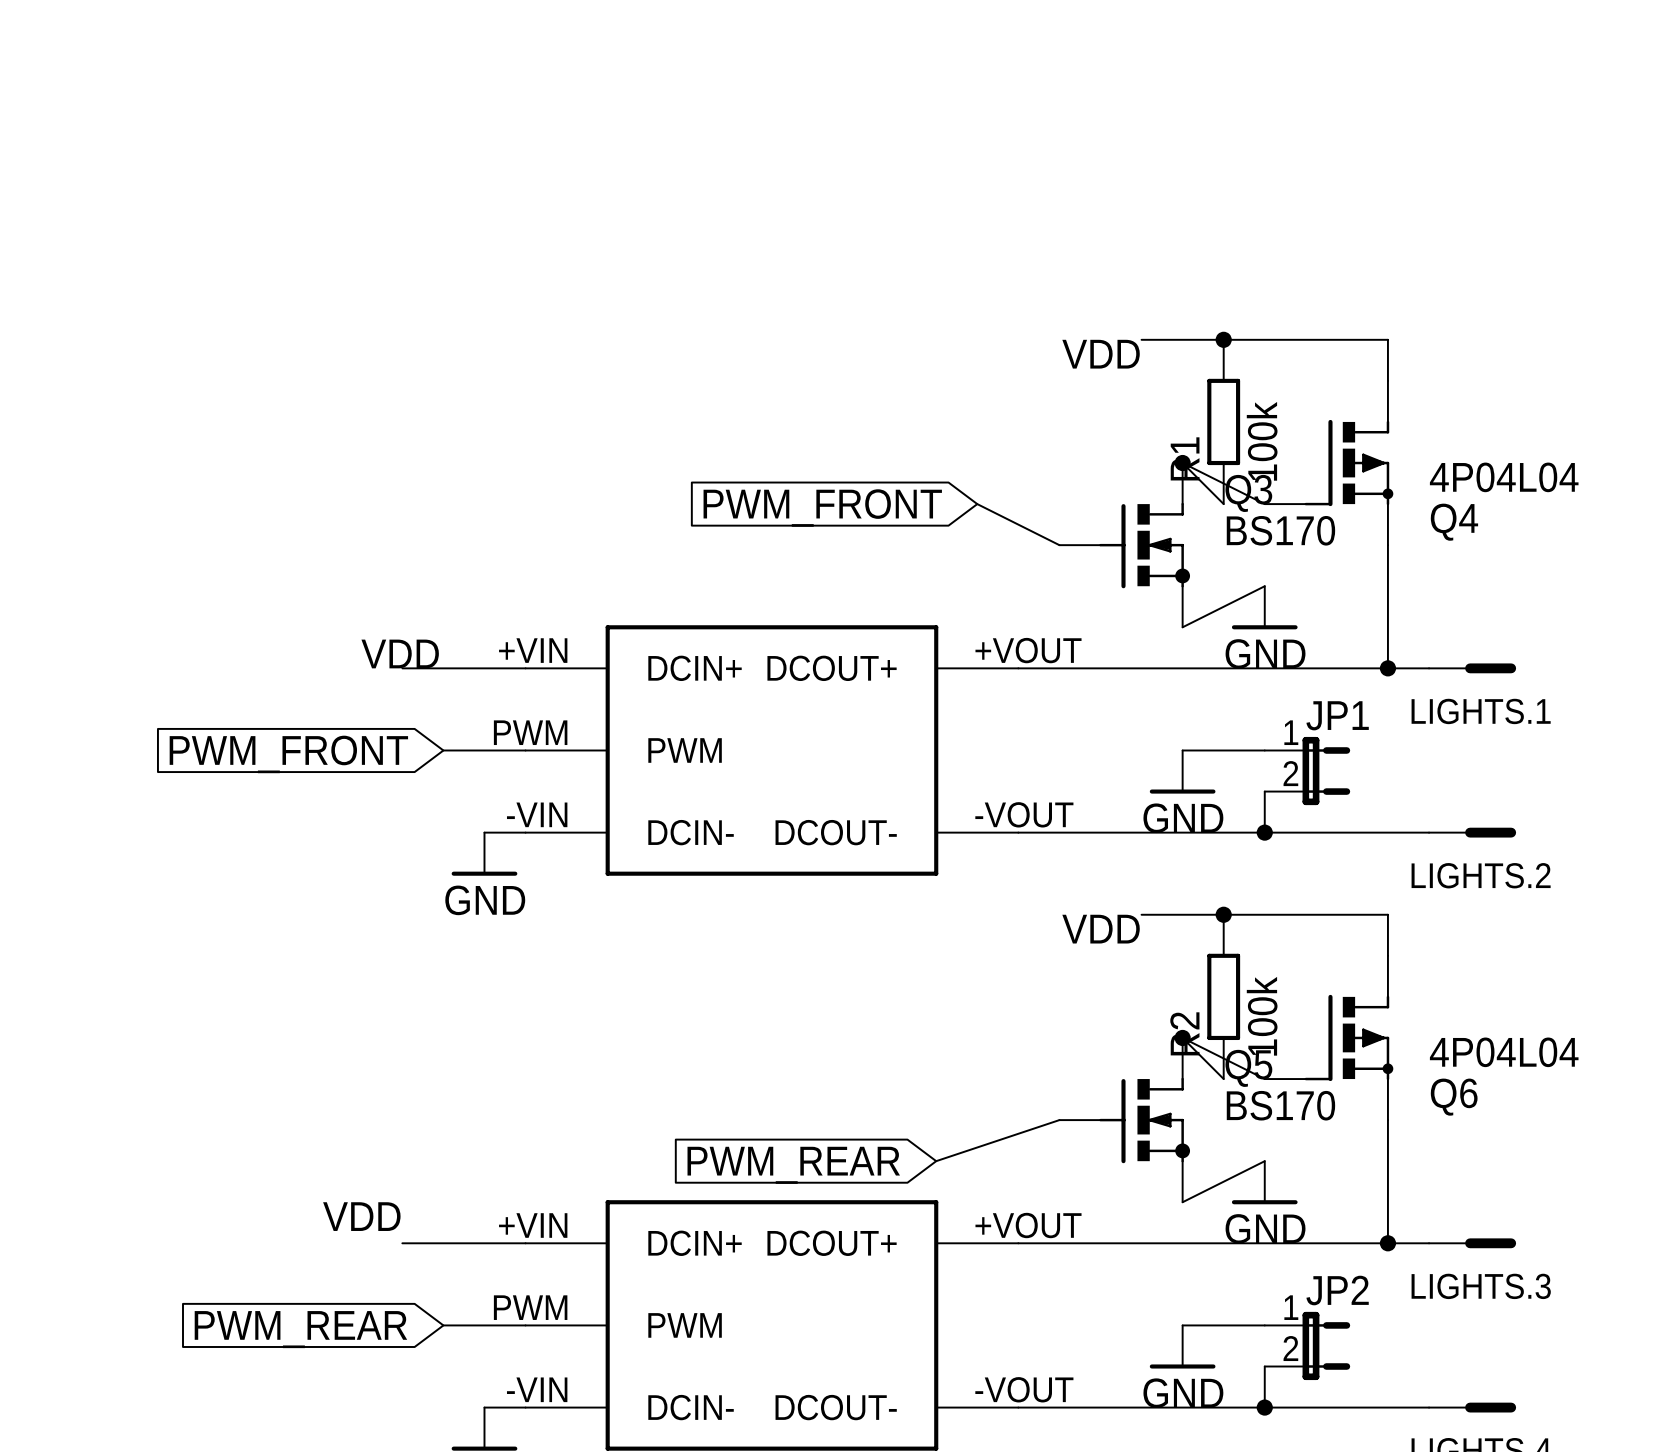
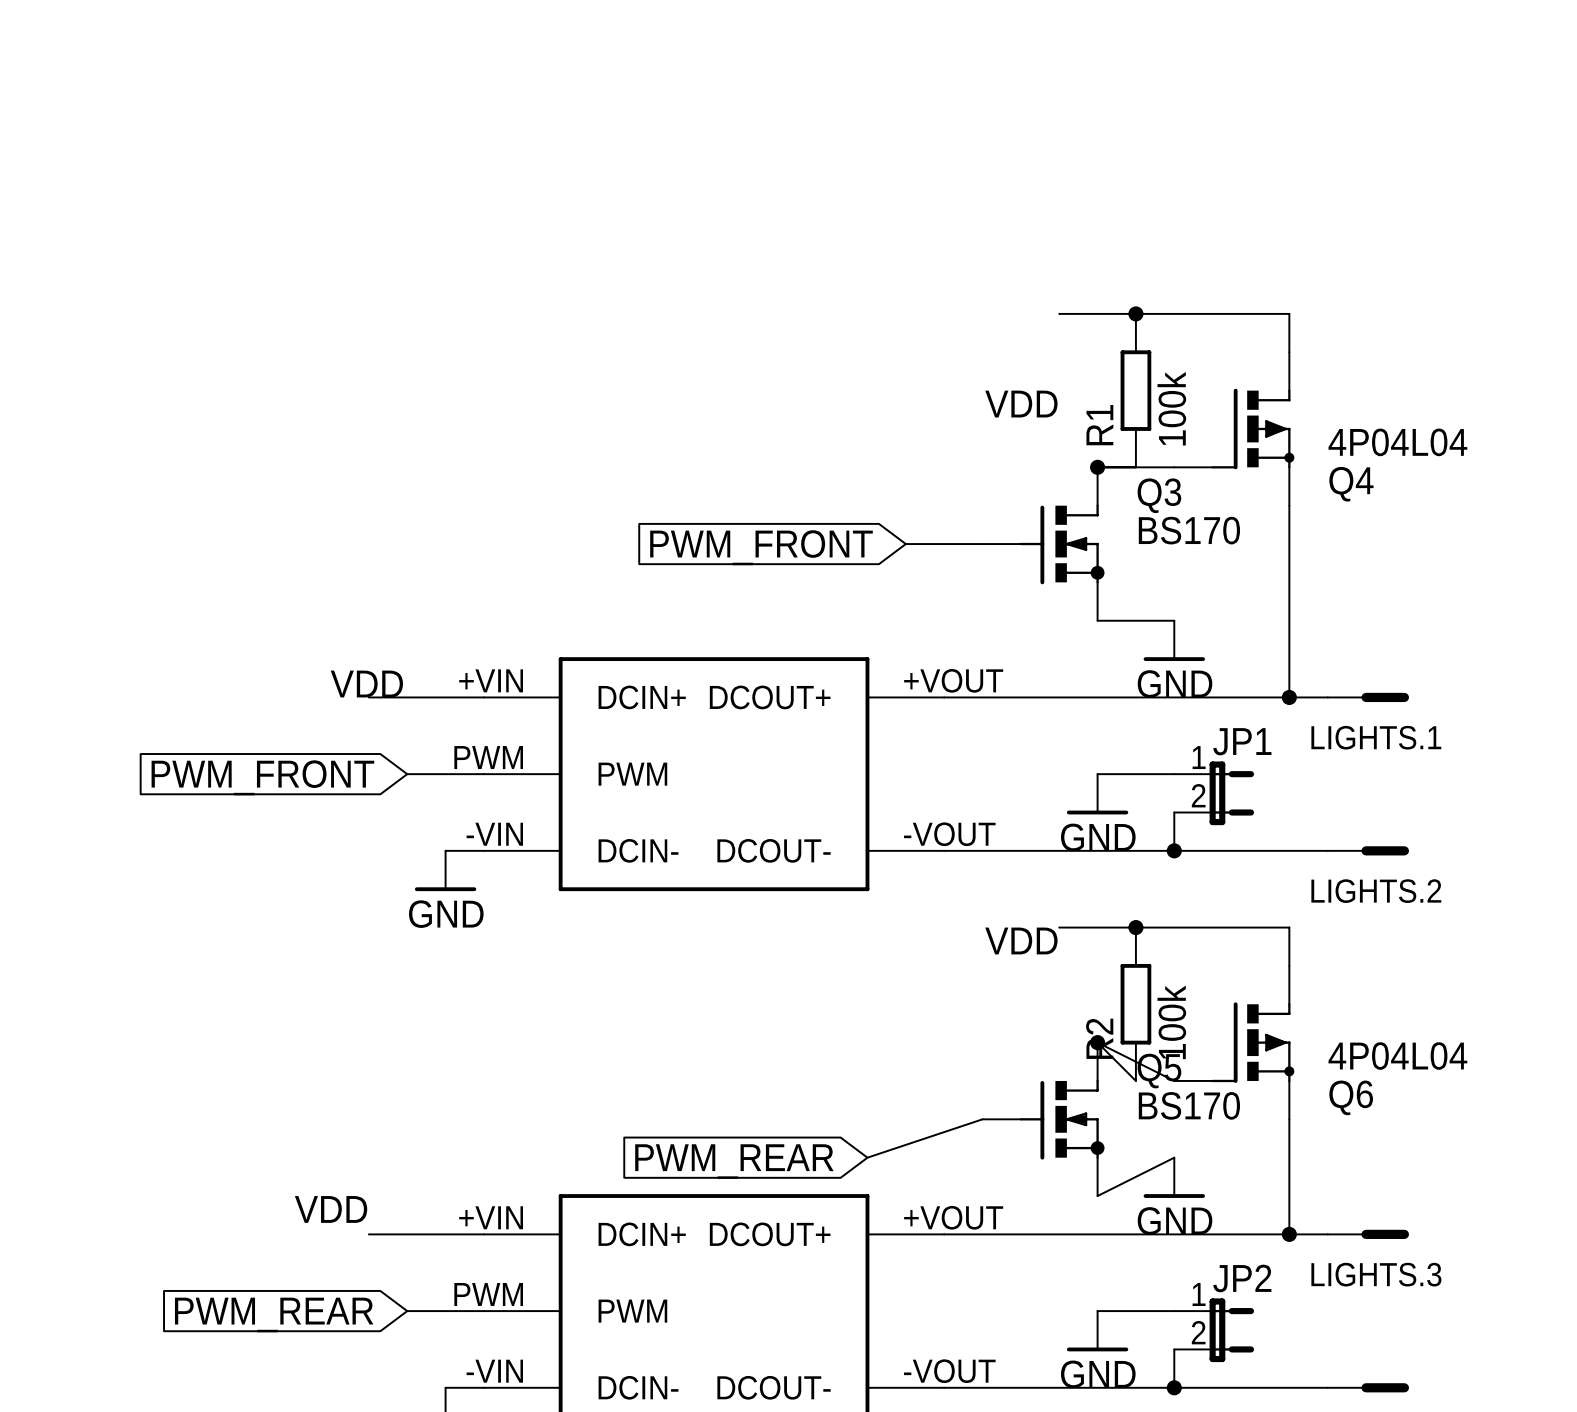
junction: none -> (1135, 313)
wire: (1141, 339) (1387, 339) (1387, 380) -> (1059, 313) (1289, 313) (1289, 352)
junction: (1223, 339) -> none
wire: none -> (1097, 467) (1174, 467)
R1 position: (1223, 421) -> (1135, 390)
junction position: (1182, 463) -> (1097, 467)
Q4 position: (1329, 463) -> (1234, 428)
wire: (977, 504) (1059, 545) -> (905, 544) (982, 544)
wire: (1223, 504) (1182, 463) (1264, 504) -> none
Q3 position: (1124, 545) -> (1043, 544)
wire: (1264, 586) (1182, 627) -> (1174, 620) (1097, 620)

